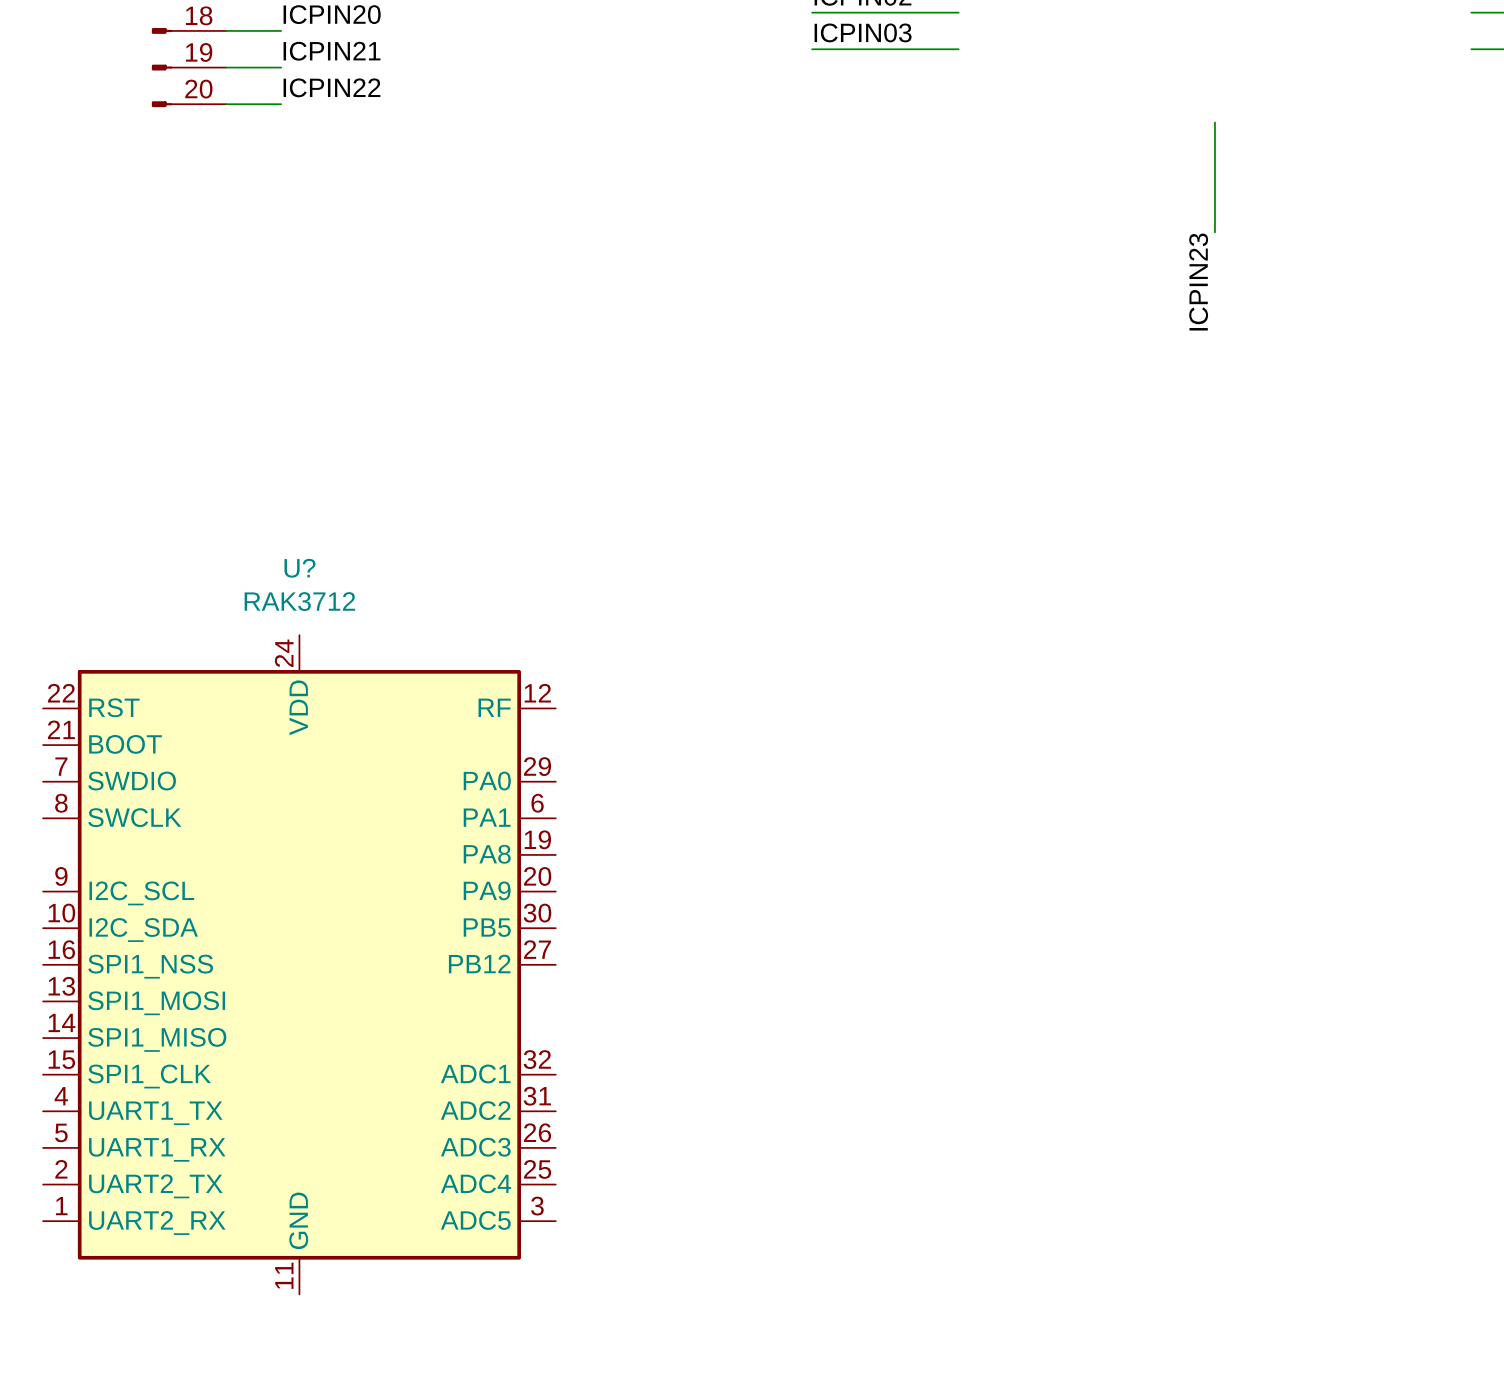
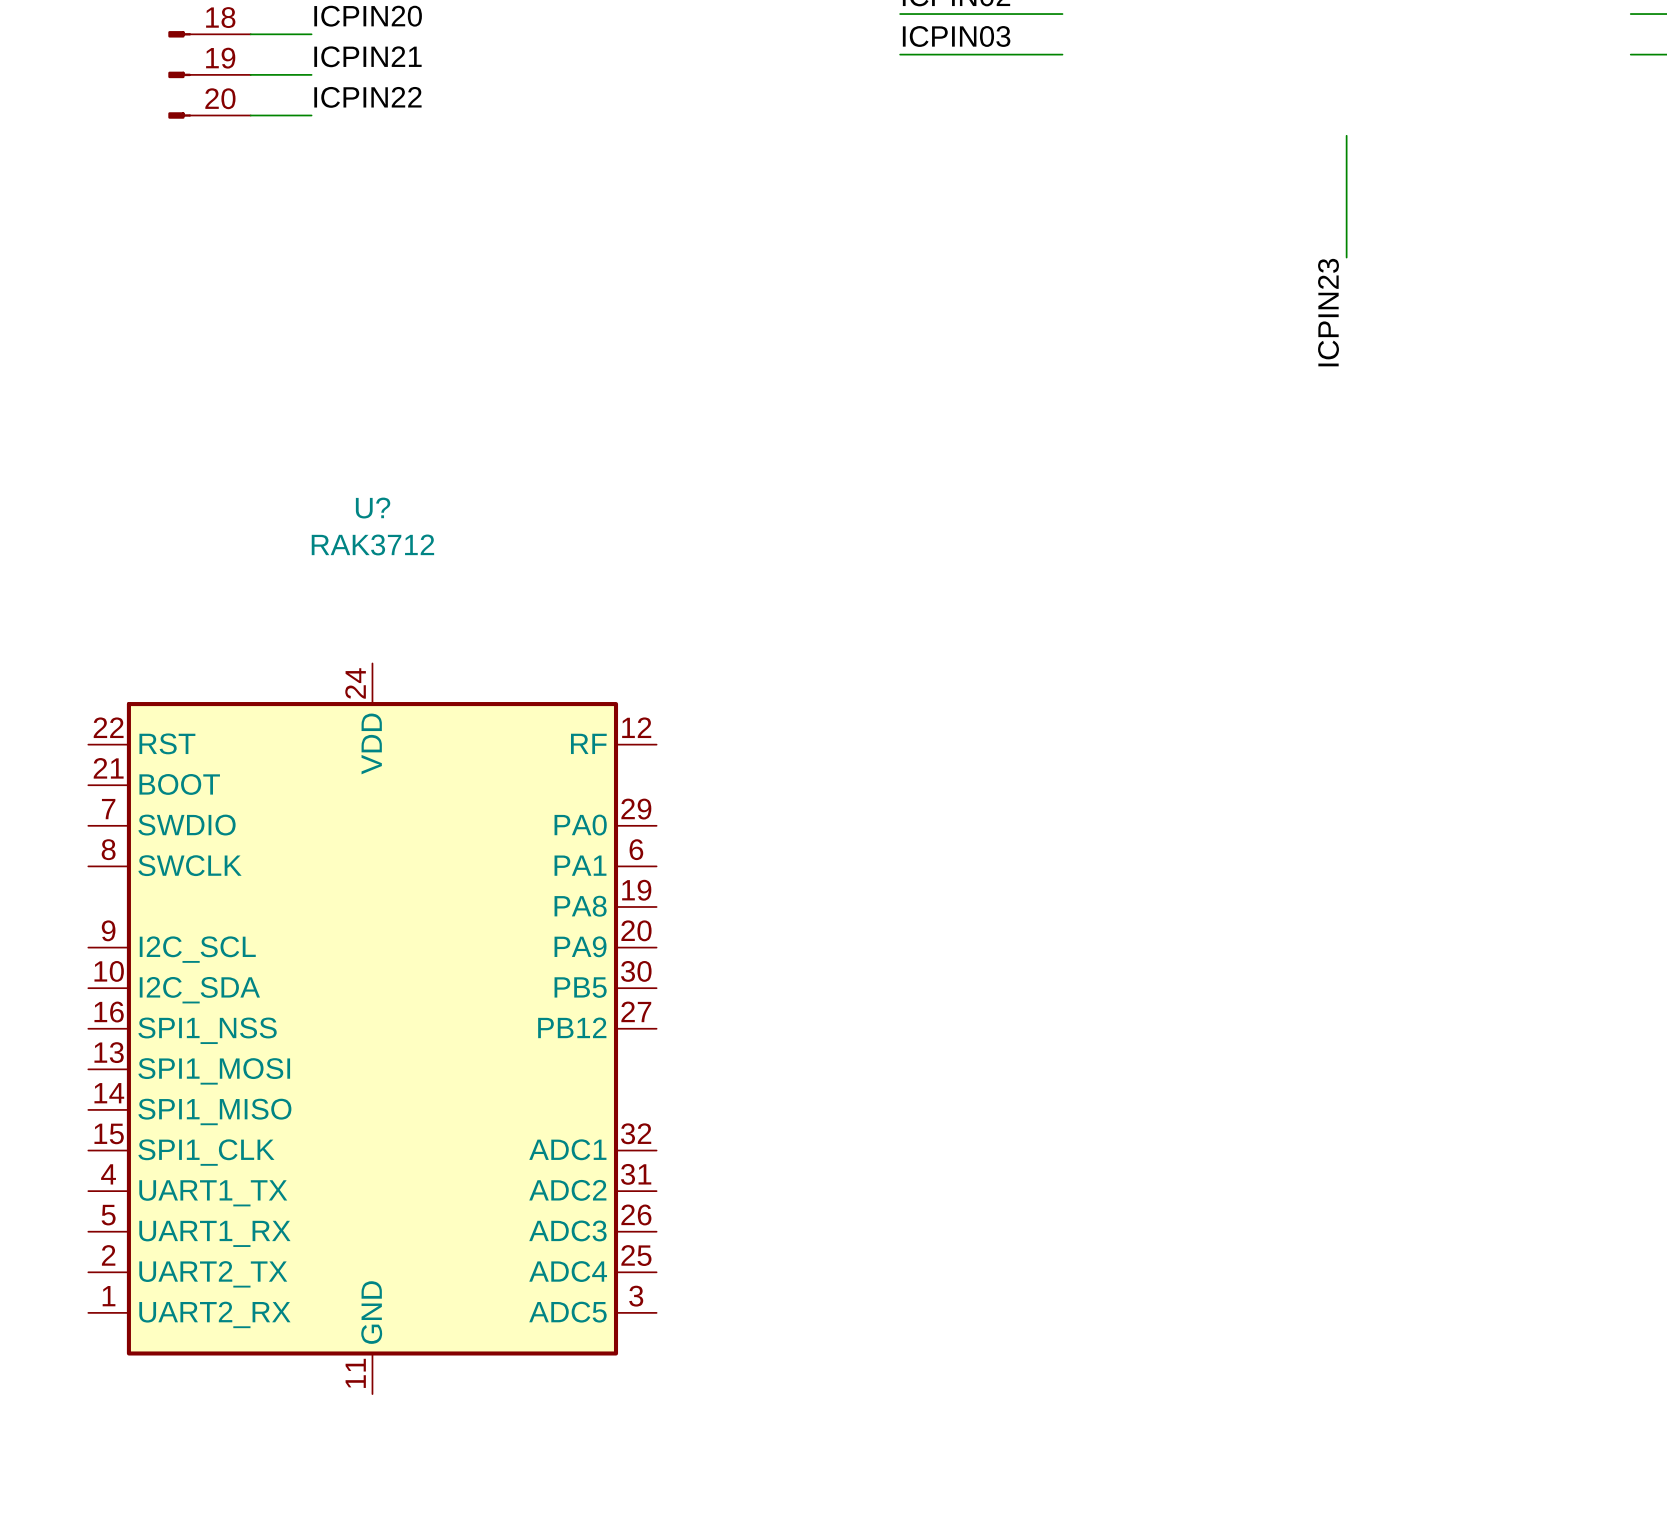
U? name position: U? (299, 568) -> U? (373, 508)
U? value position: RAK3712 (299, 601) -> RAK3712 (372, 544)
U? position: (299, 964) -> (372, 1028)

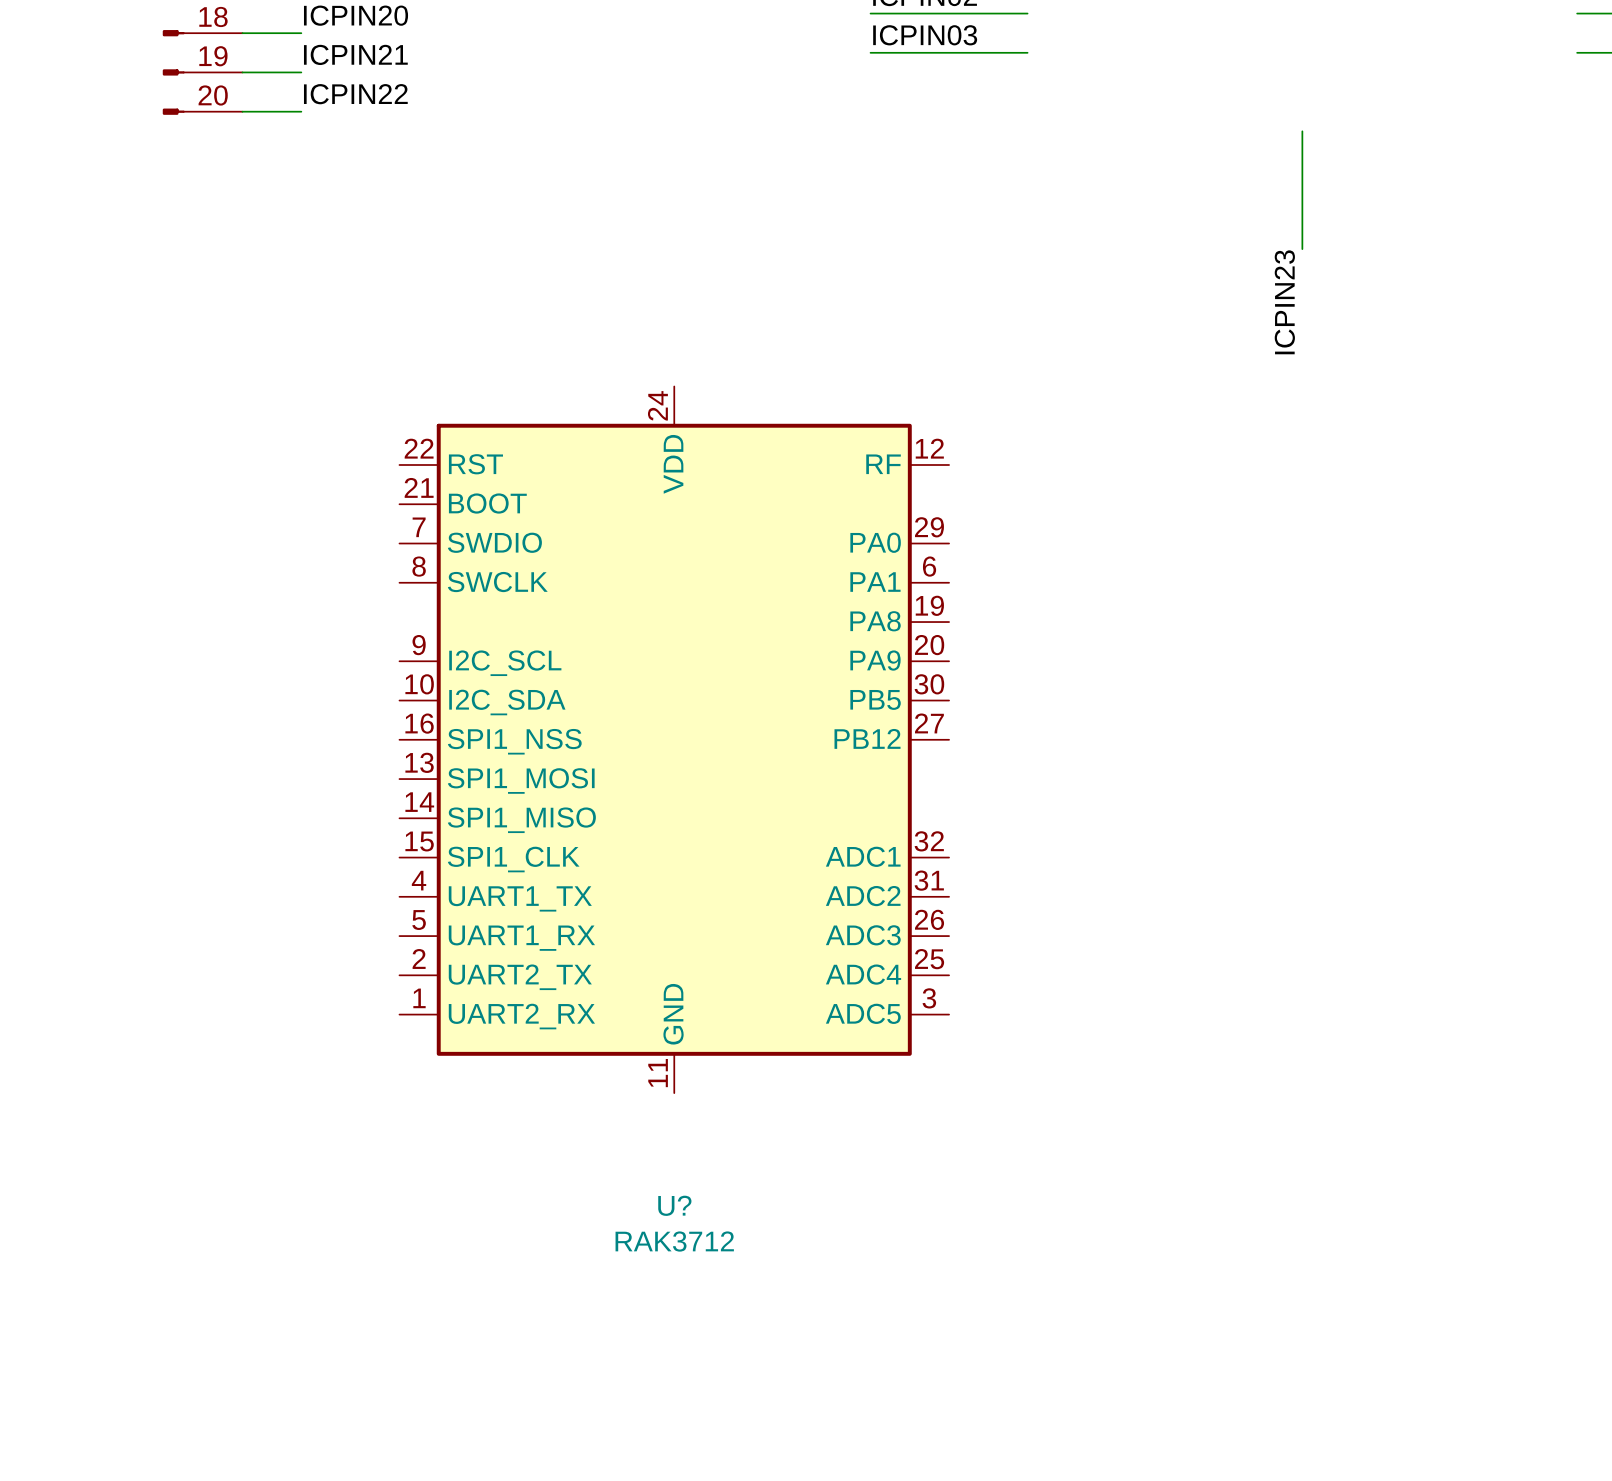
U?: none -> RAK3712 (674, 739)
U?: RAK3712 (372, 1028) -> none

